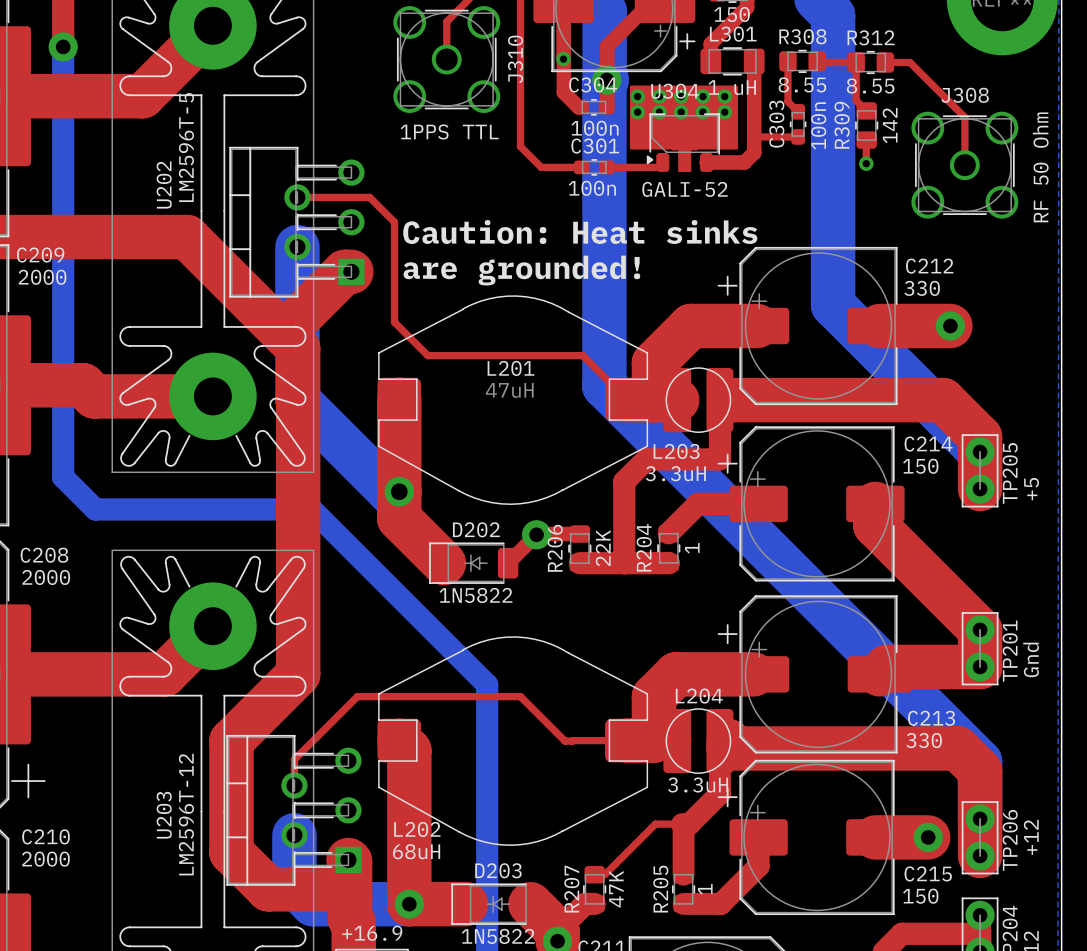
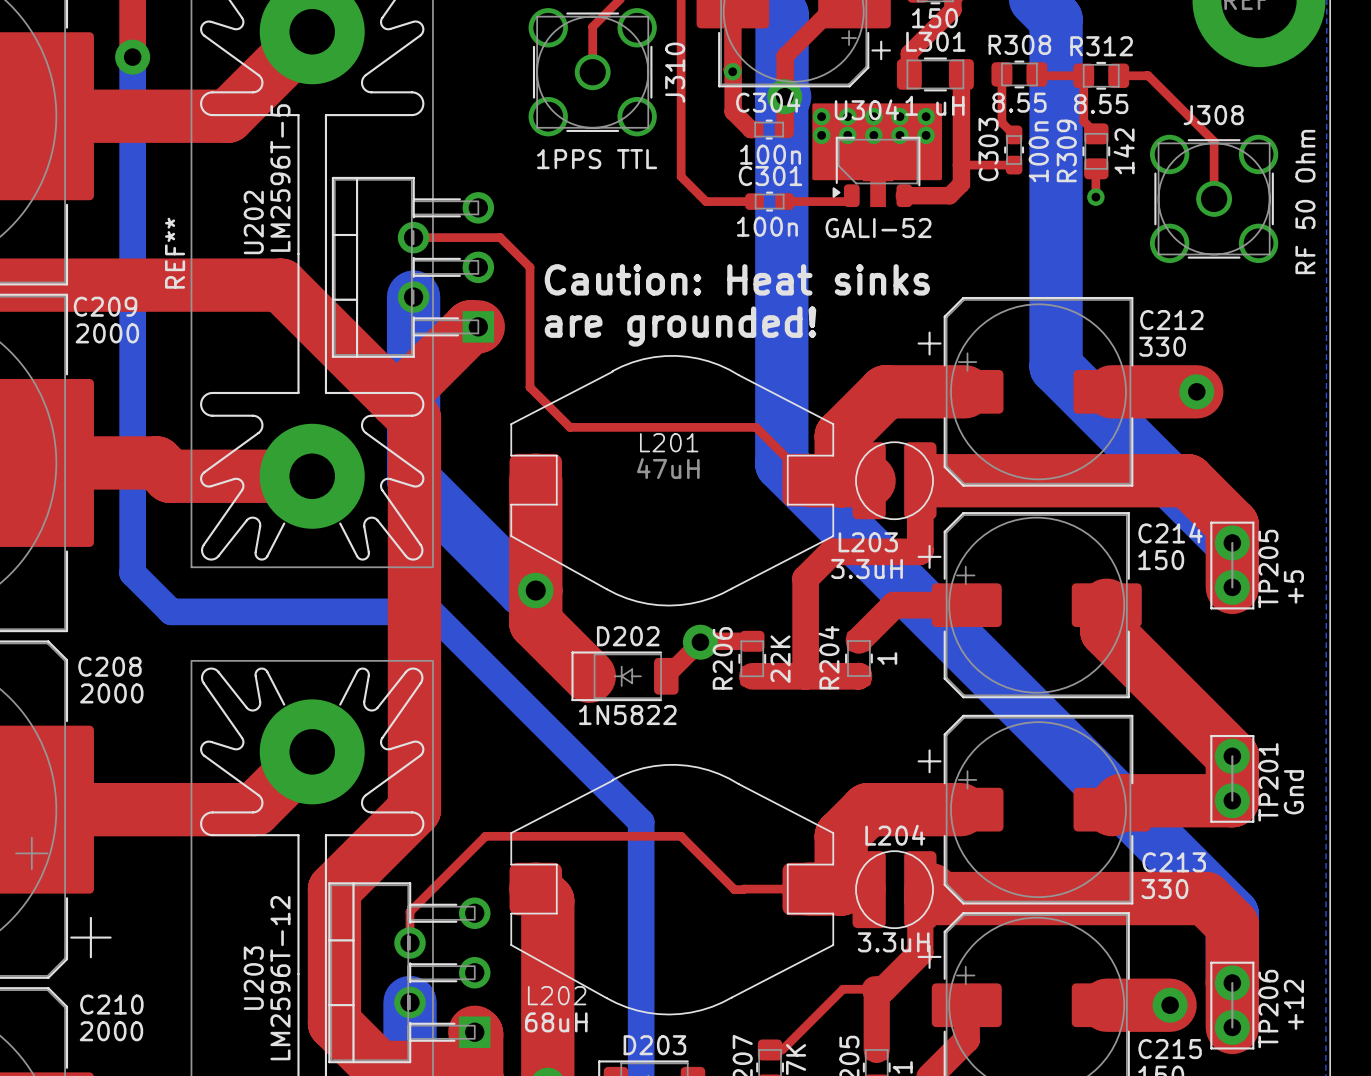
REF** name: none -> REF** (175, 253)

